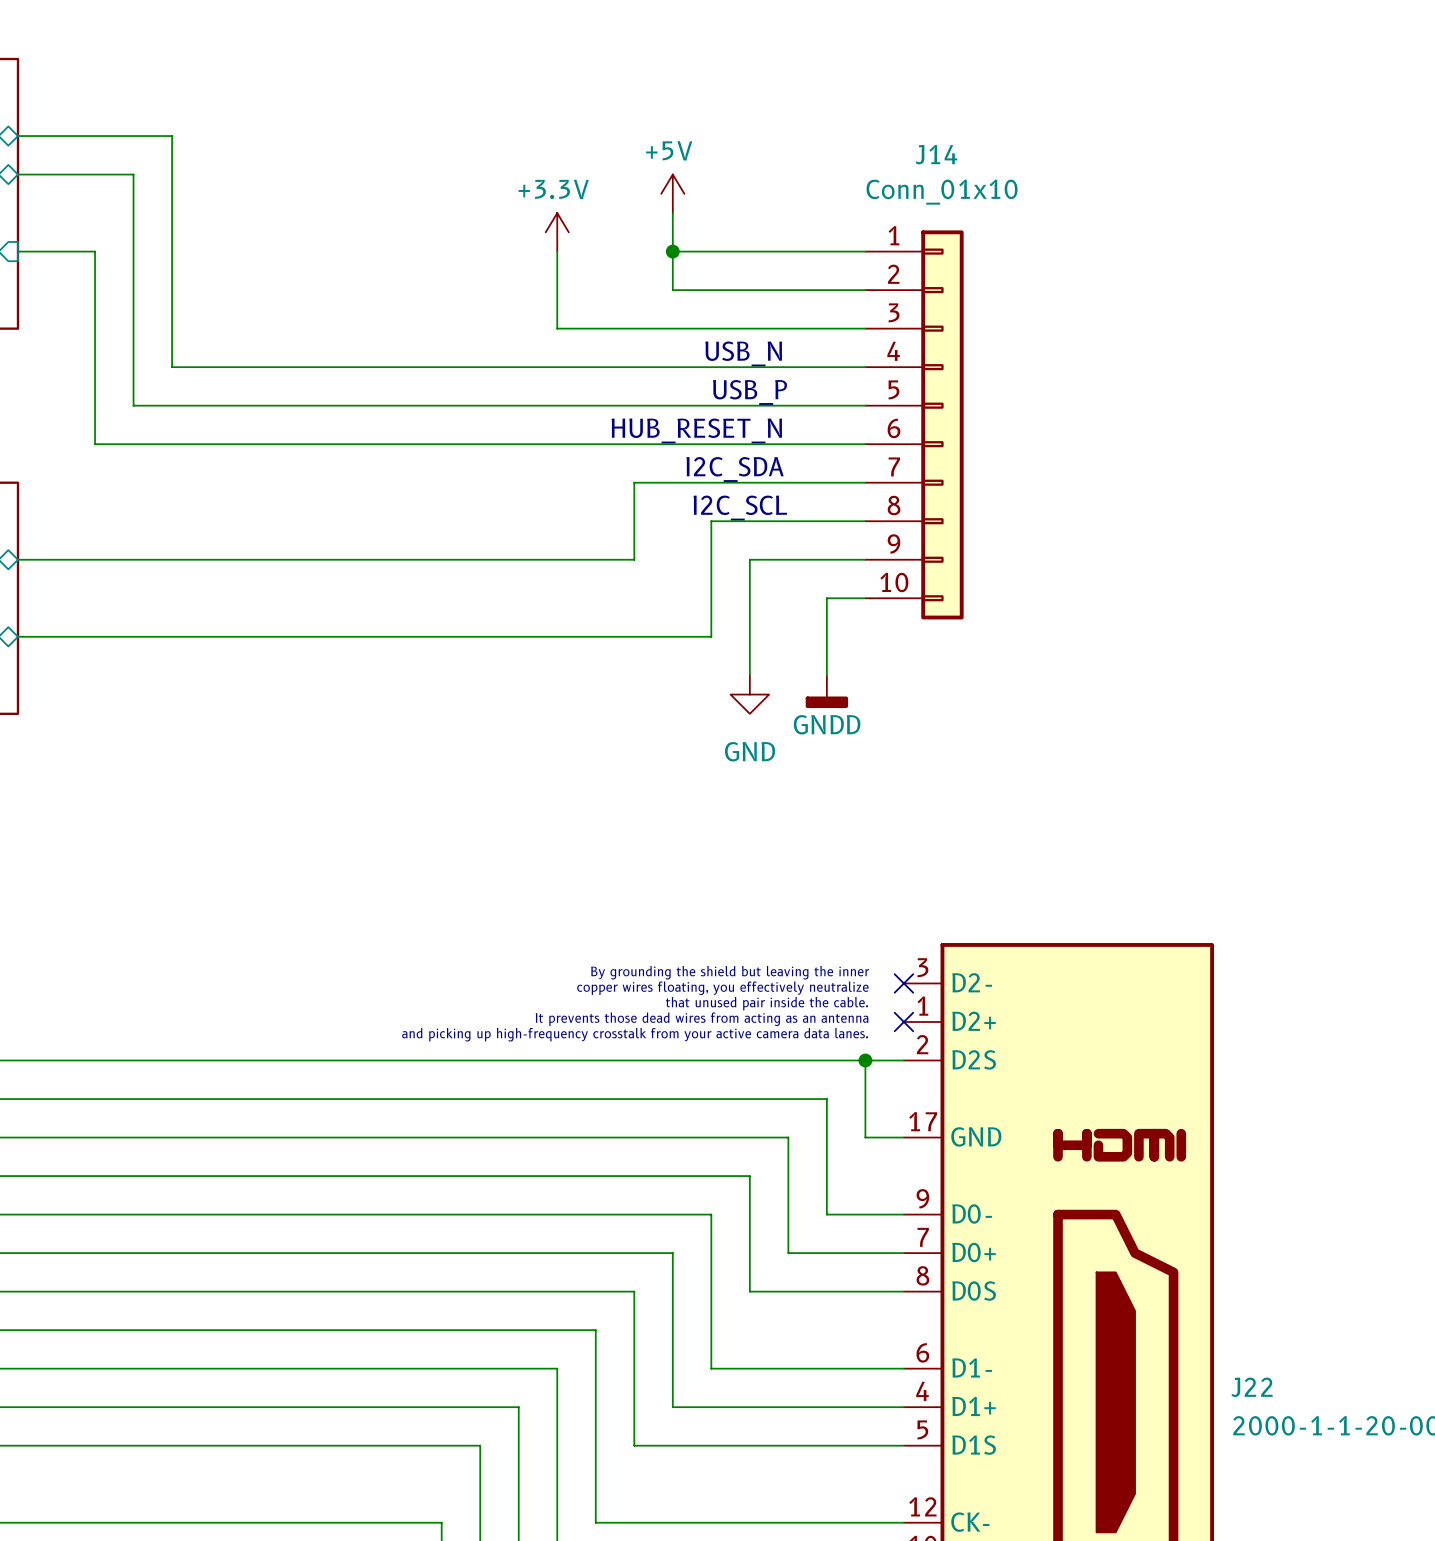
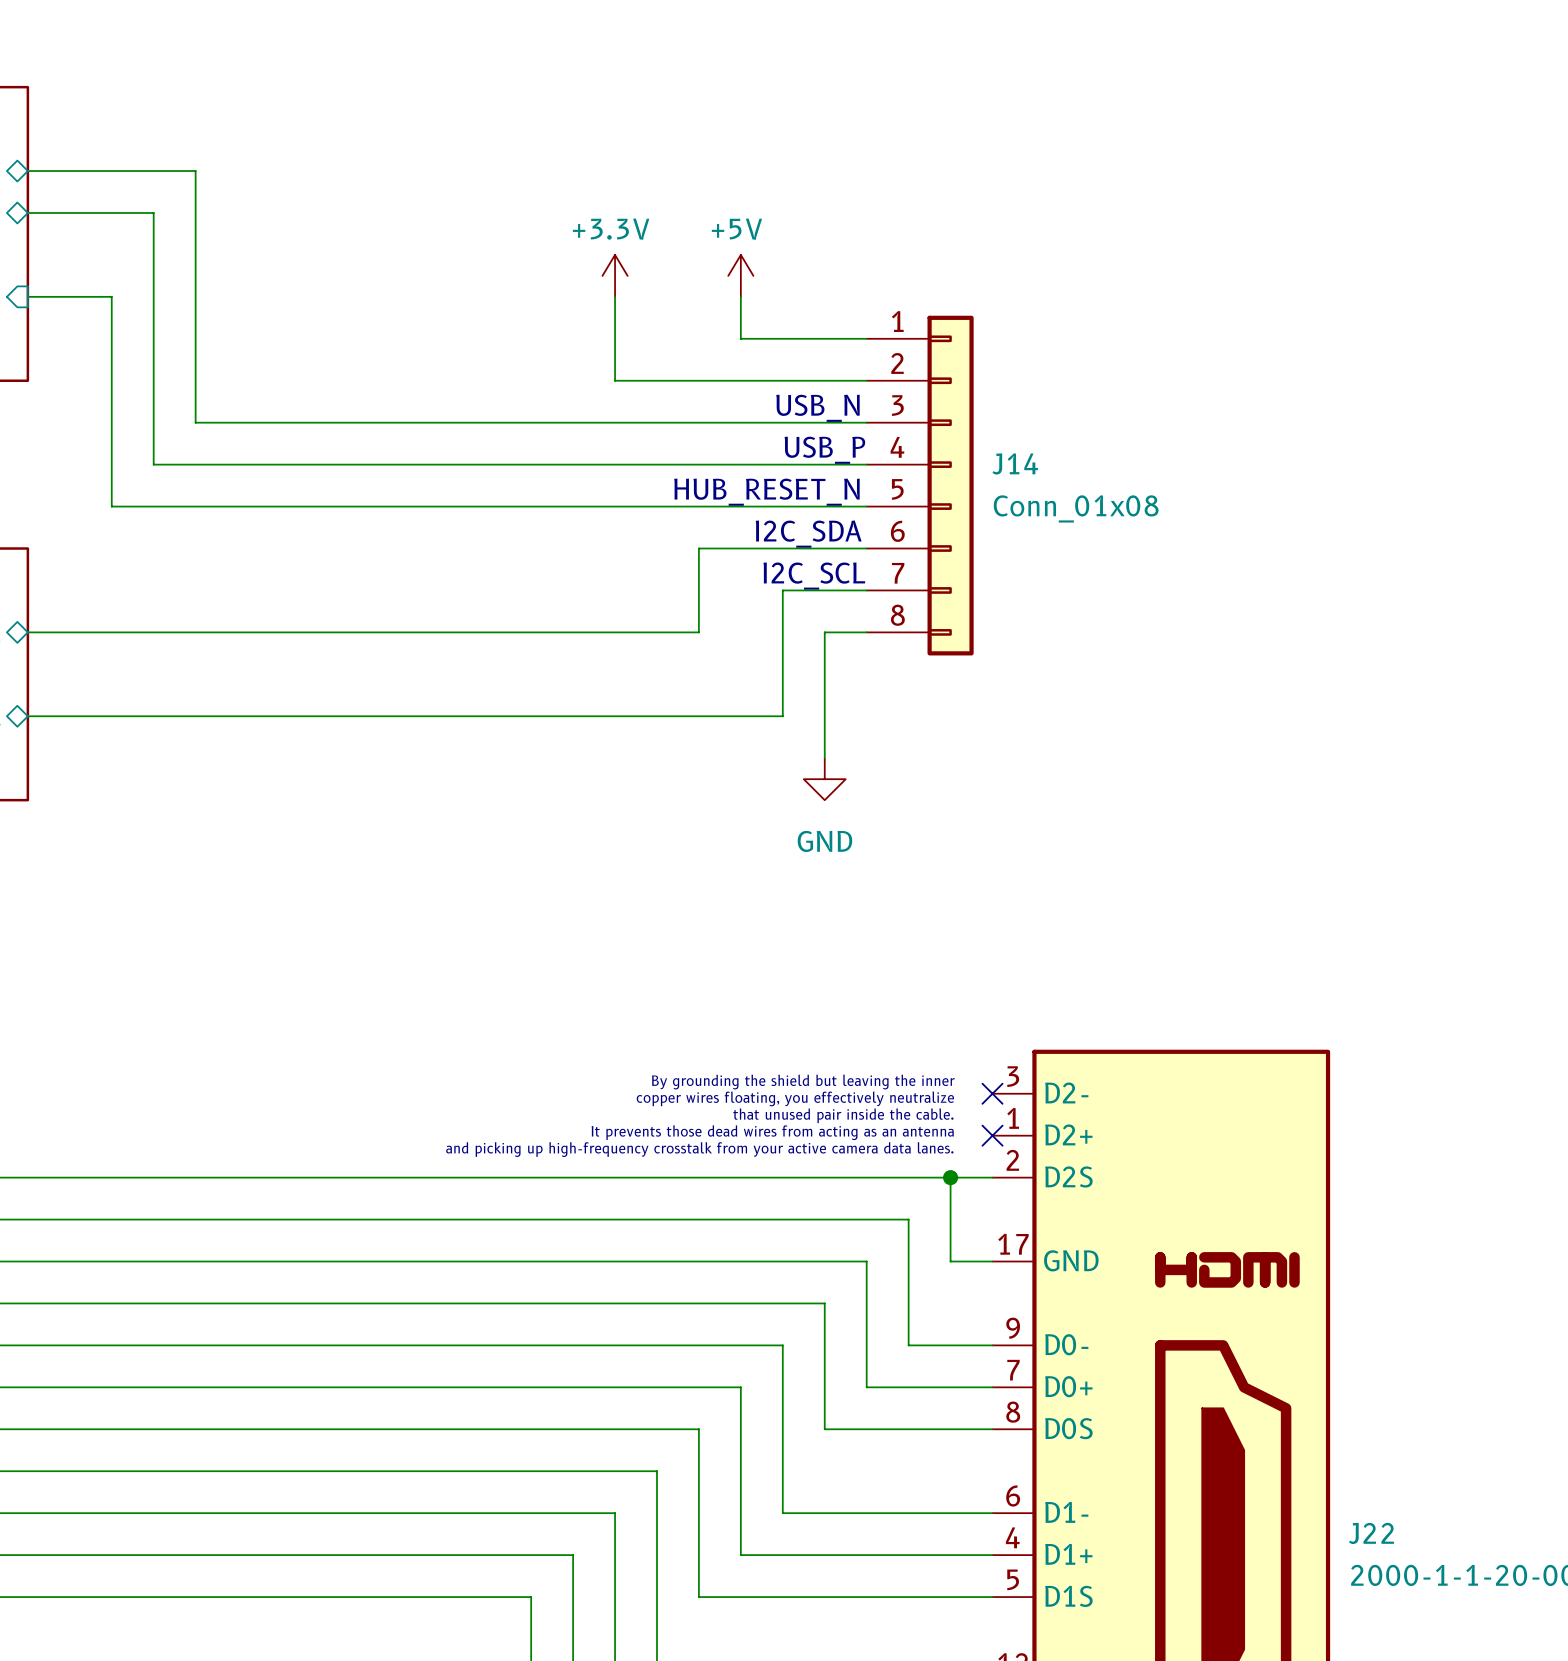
J14 name position: J14 (936, 154) -> J14 (1015, 463)
J14 value: Conn_01x10 (942, 192) -> Conn_01x08 (1076, 508)
power symbol position: +5V (672, 193) -> +5V (740, 275)
wire: (672, 213) (672, 251) (865, 251) -> none
J14 symbol: [865, 230, 964, 620] -> [866, 315, 974, 656]
junction: (672, 251) -> none
wire: (865, 598) (826, 598) (826, 675) -> none
power symbol: GNDD (826, 691) -> none

